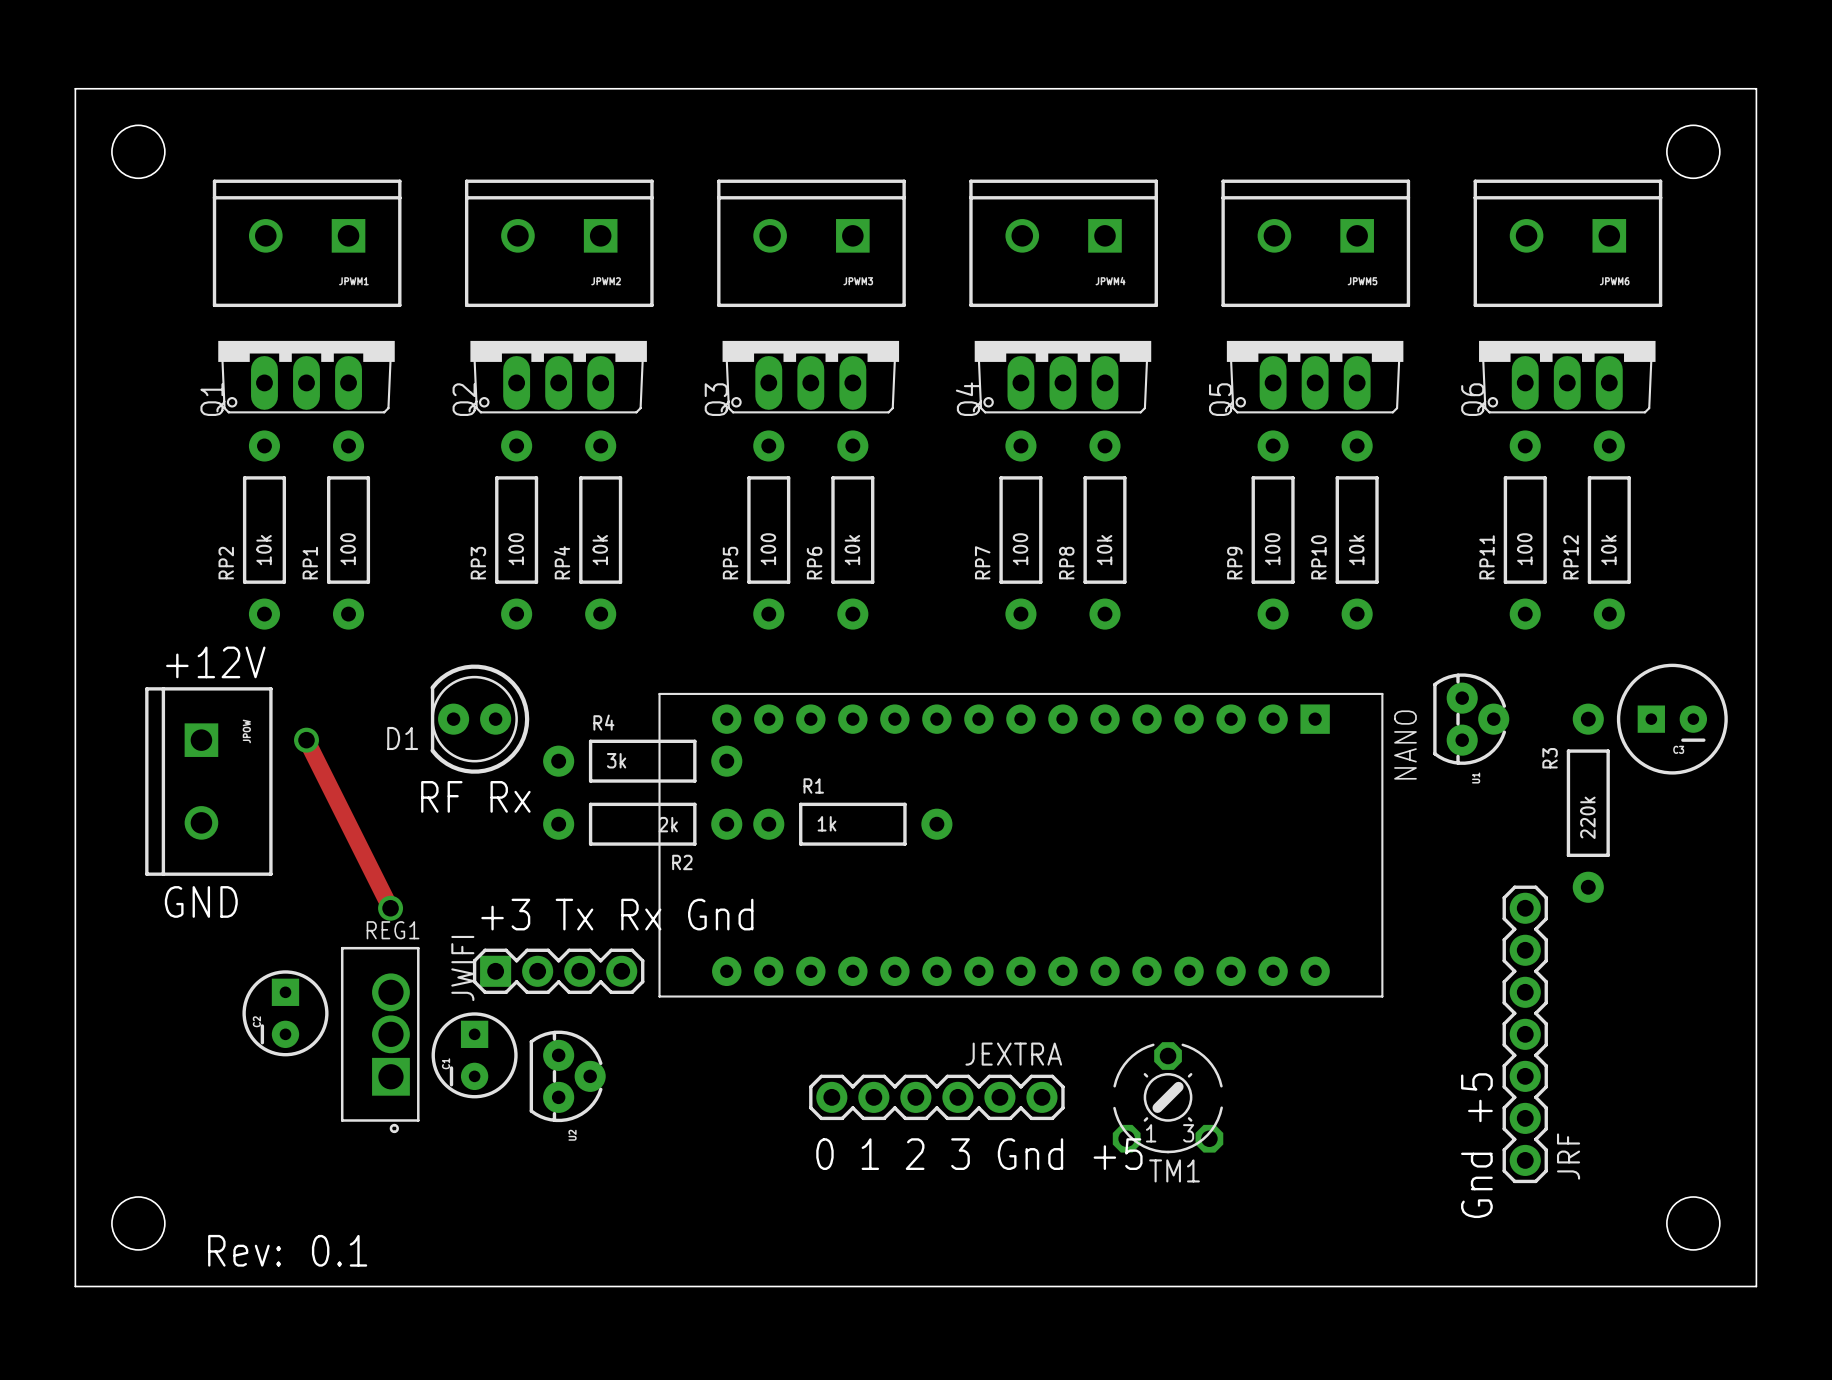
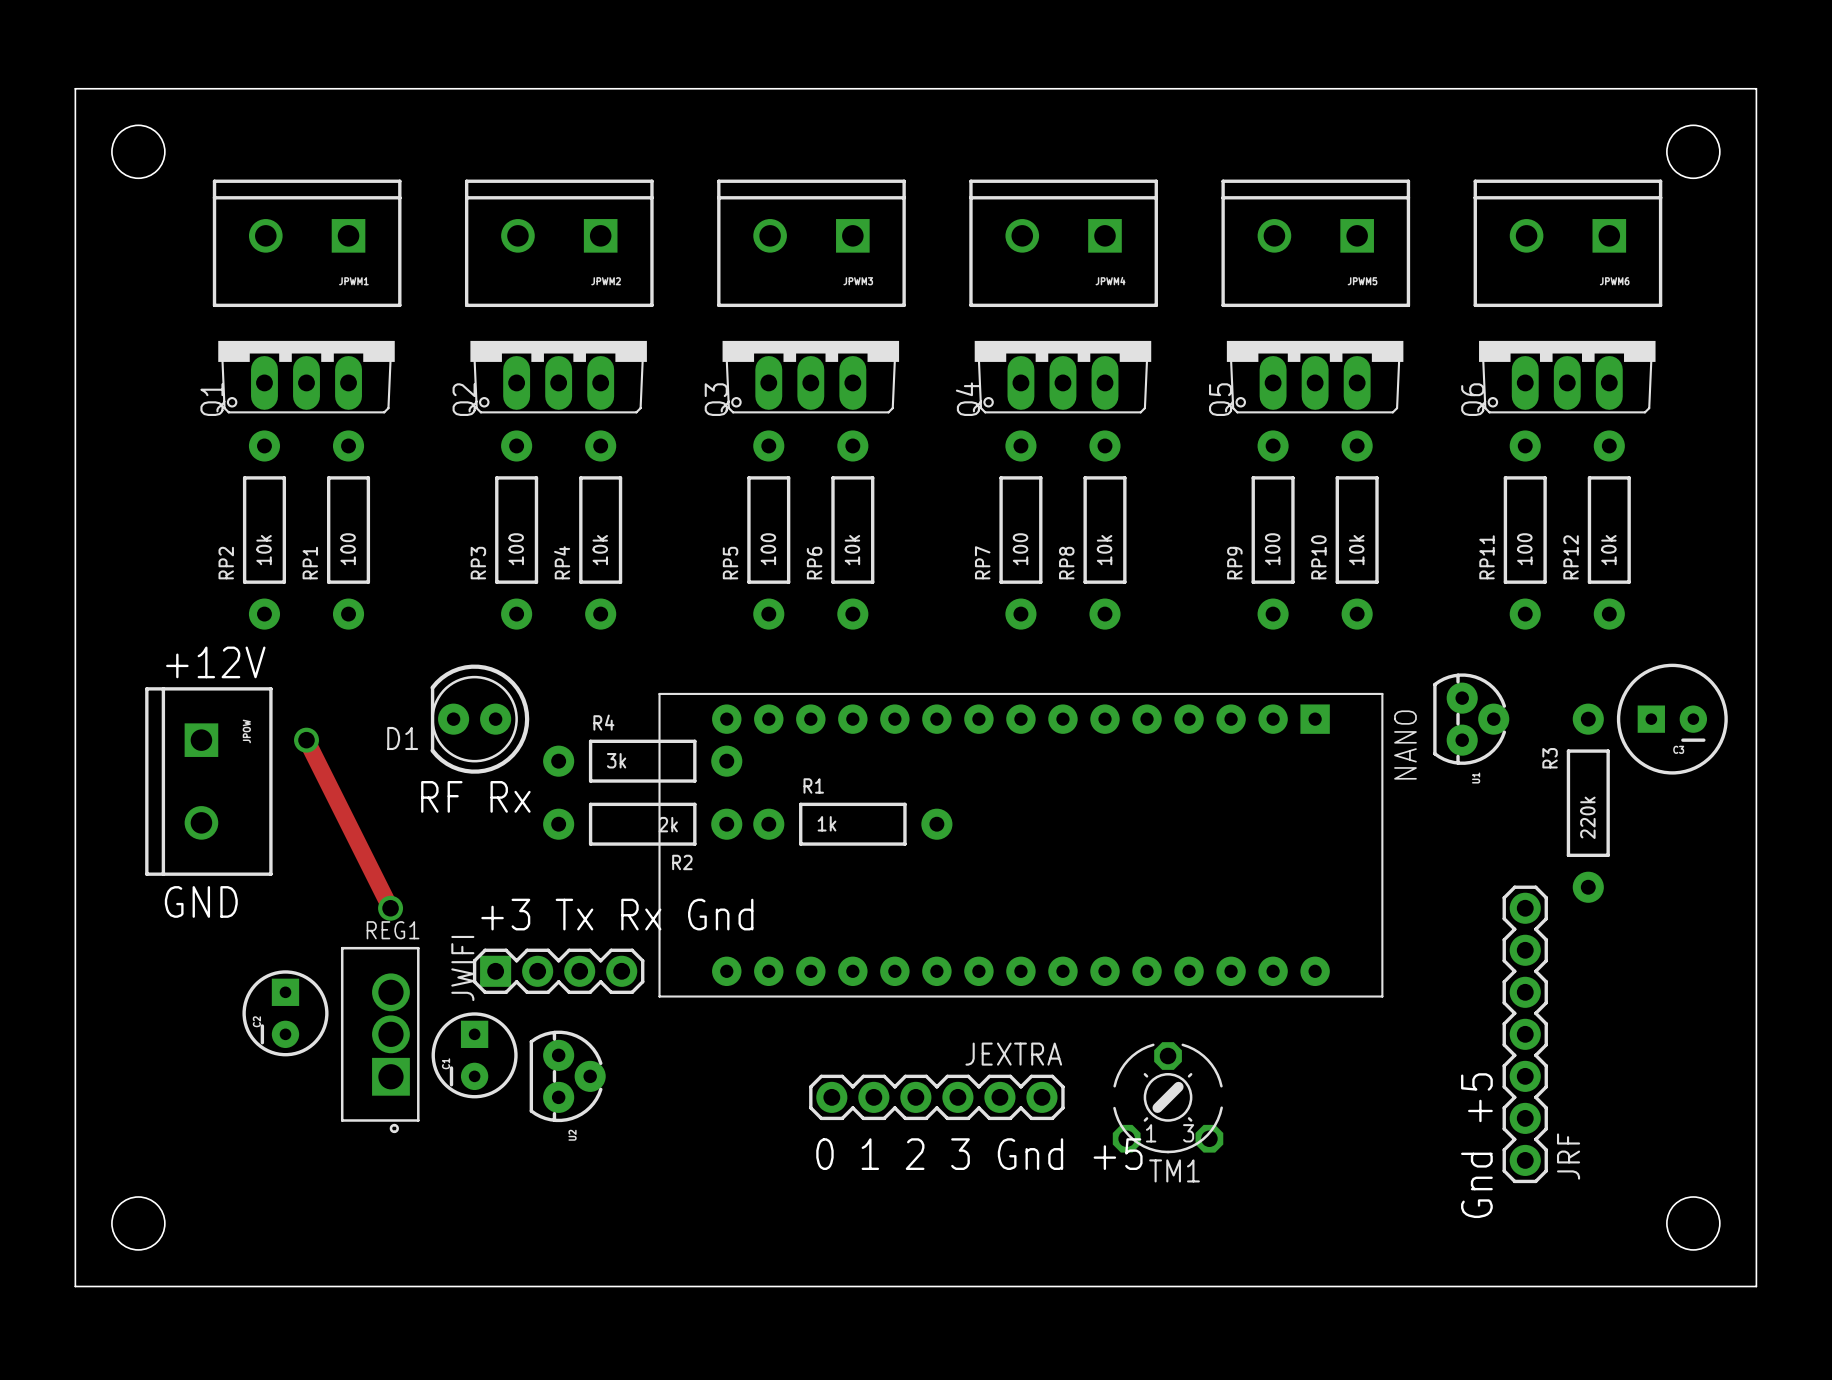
text: Rev: (244, 1250) -> none
text: 0.1 (339, 1250) -> none

